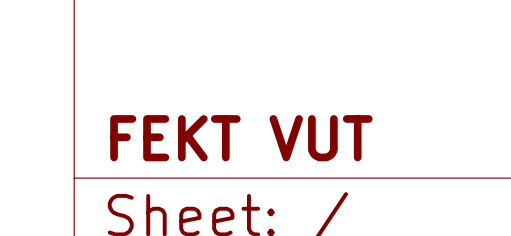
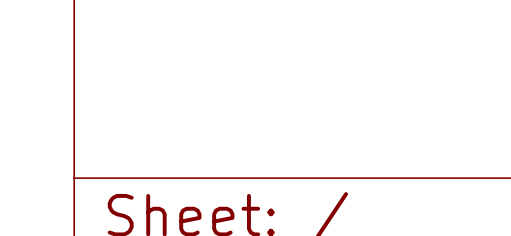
title block: FEKT VUT (241, 138) -> none

